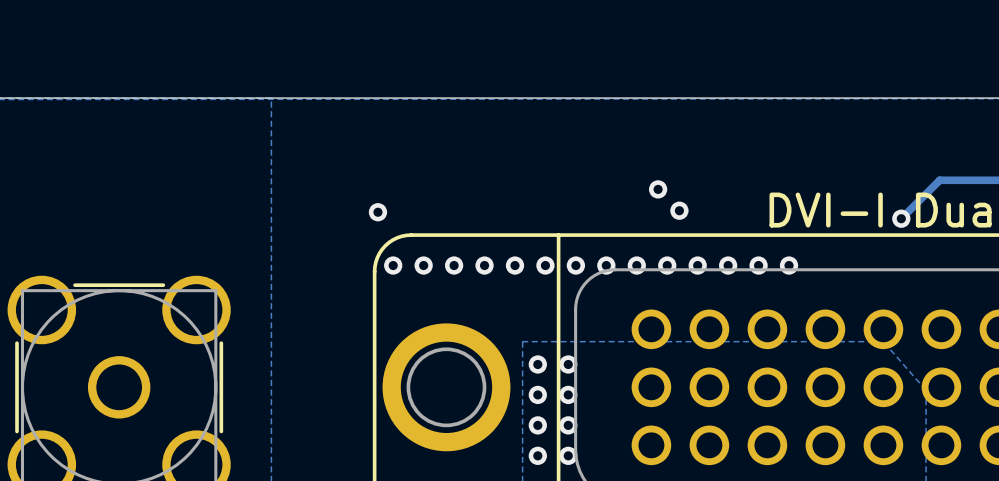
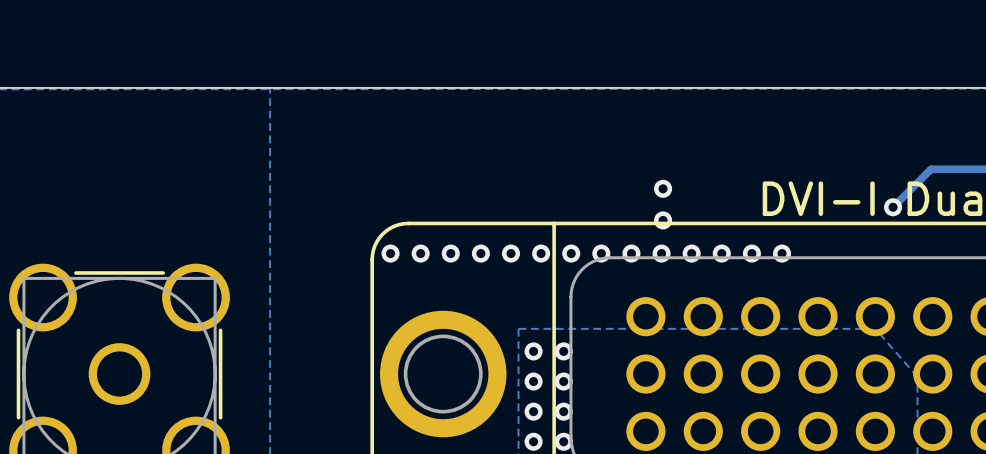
via: (658, 189) -> none
via: none -> (663, 188)
via: (679, 210) -> none
via: (377, 212) -> none
via: none -> (663, 220)

